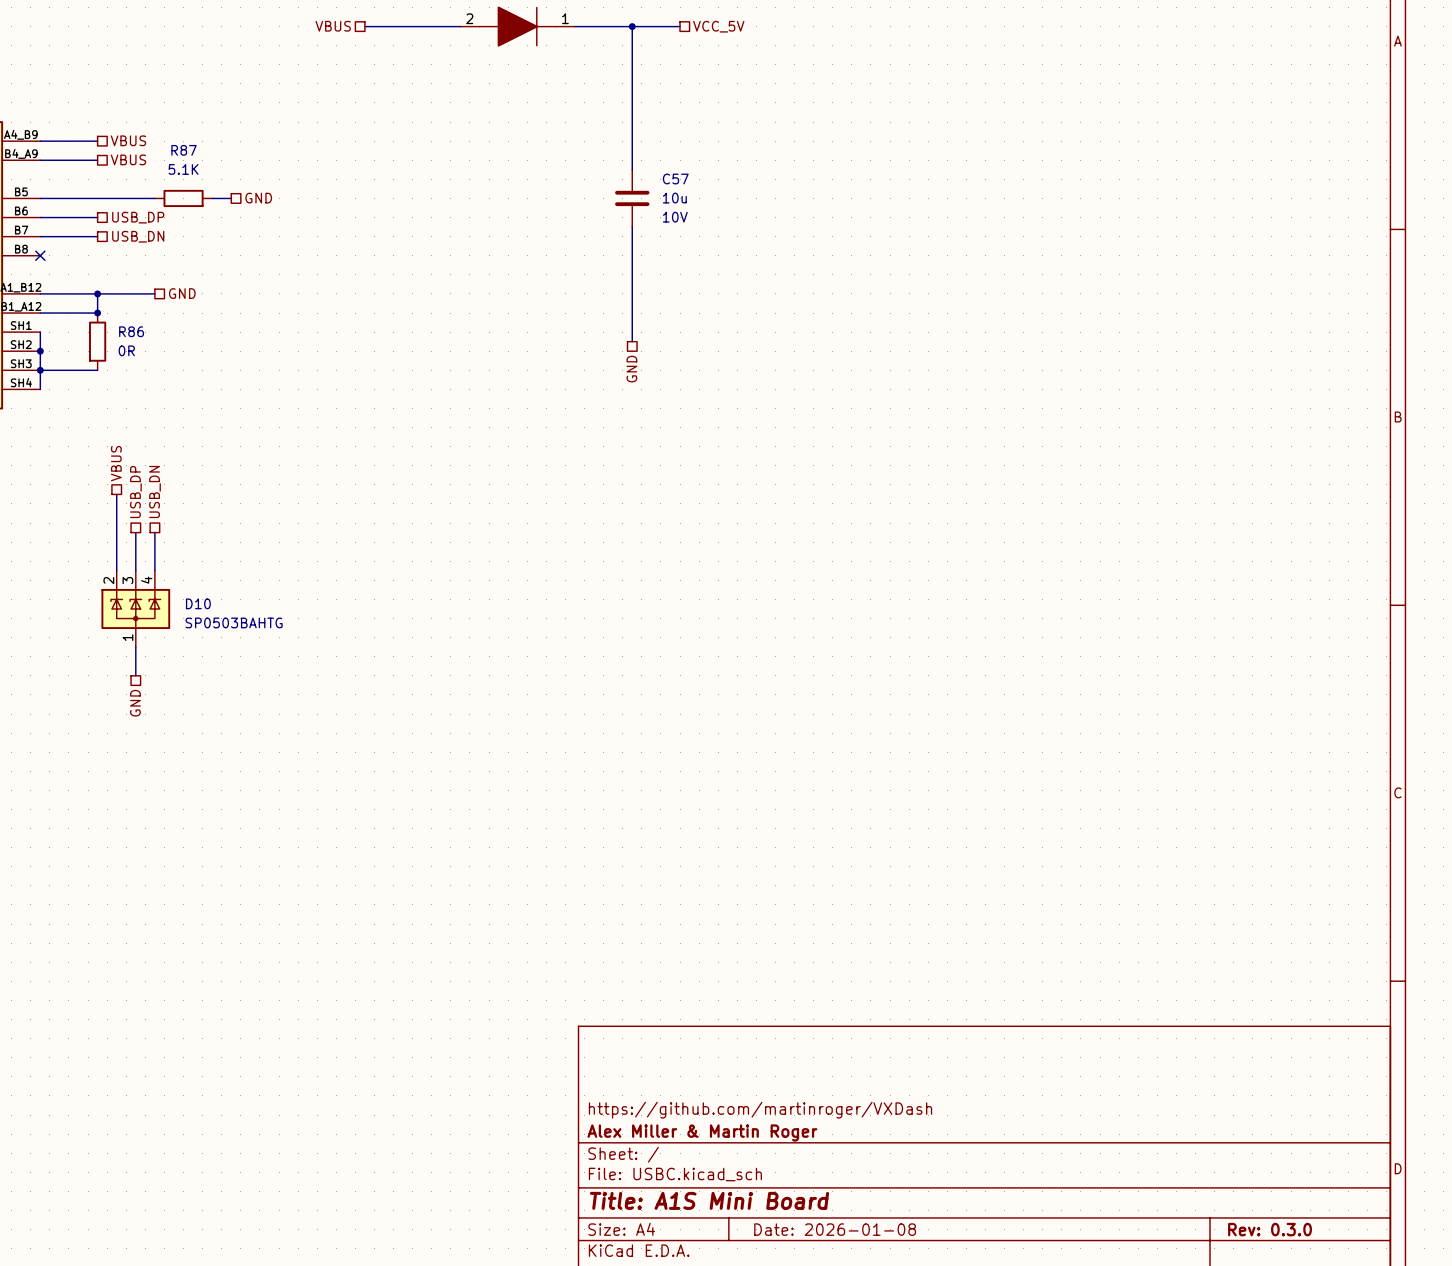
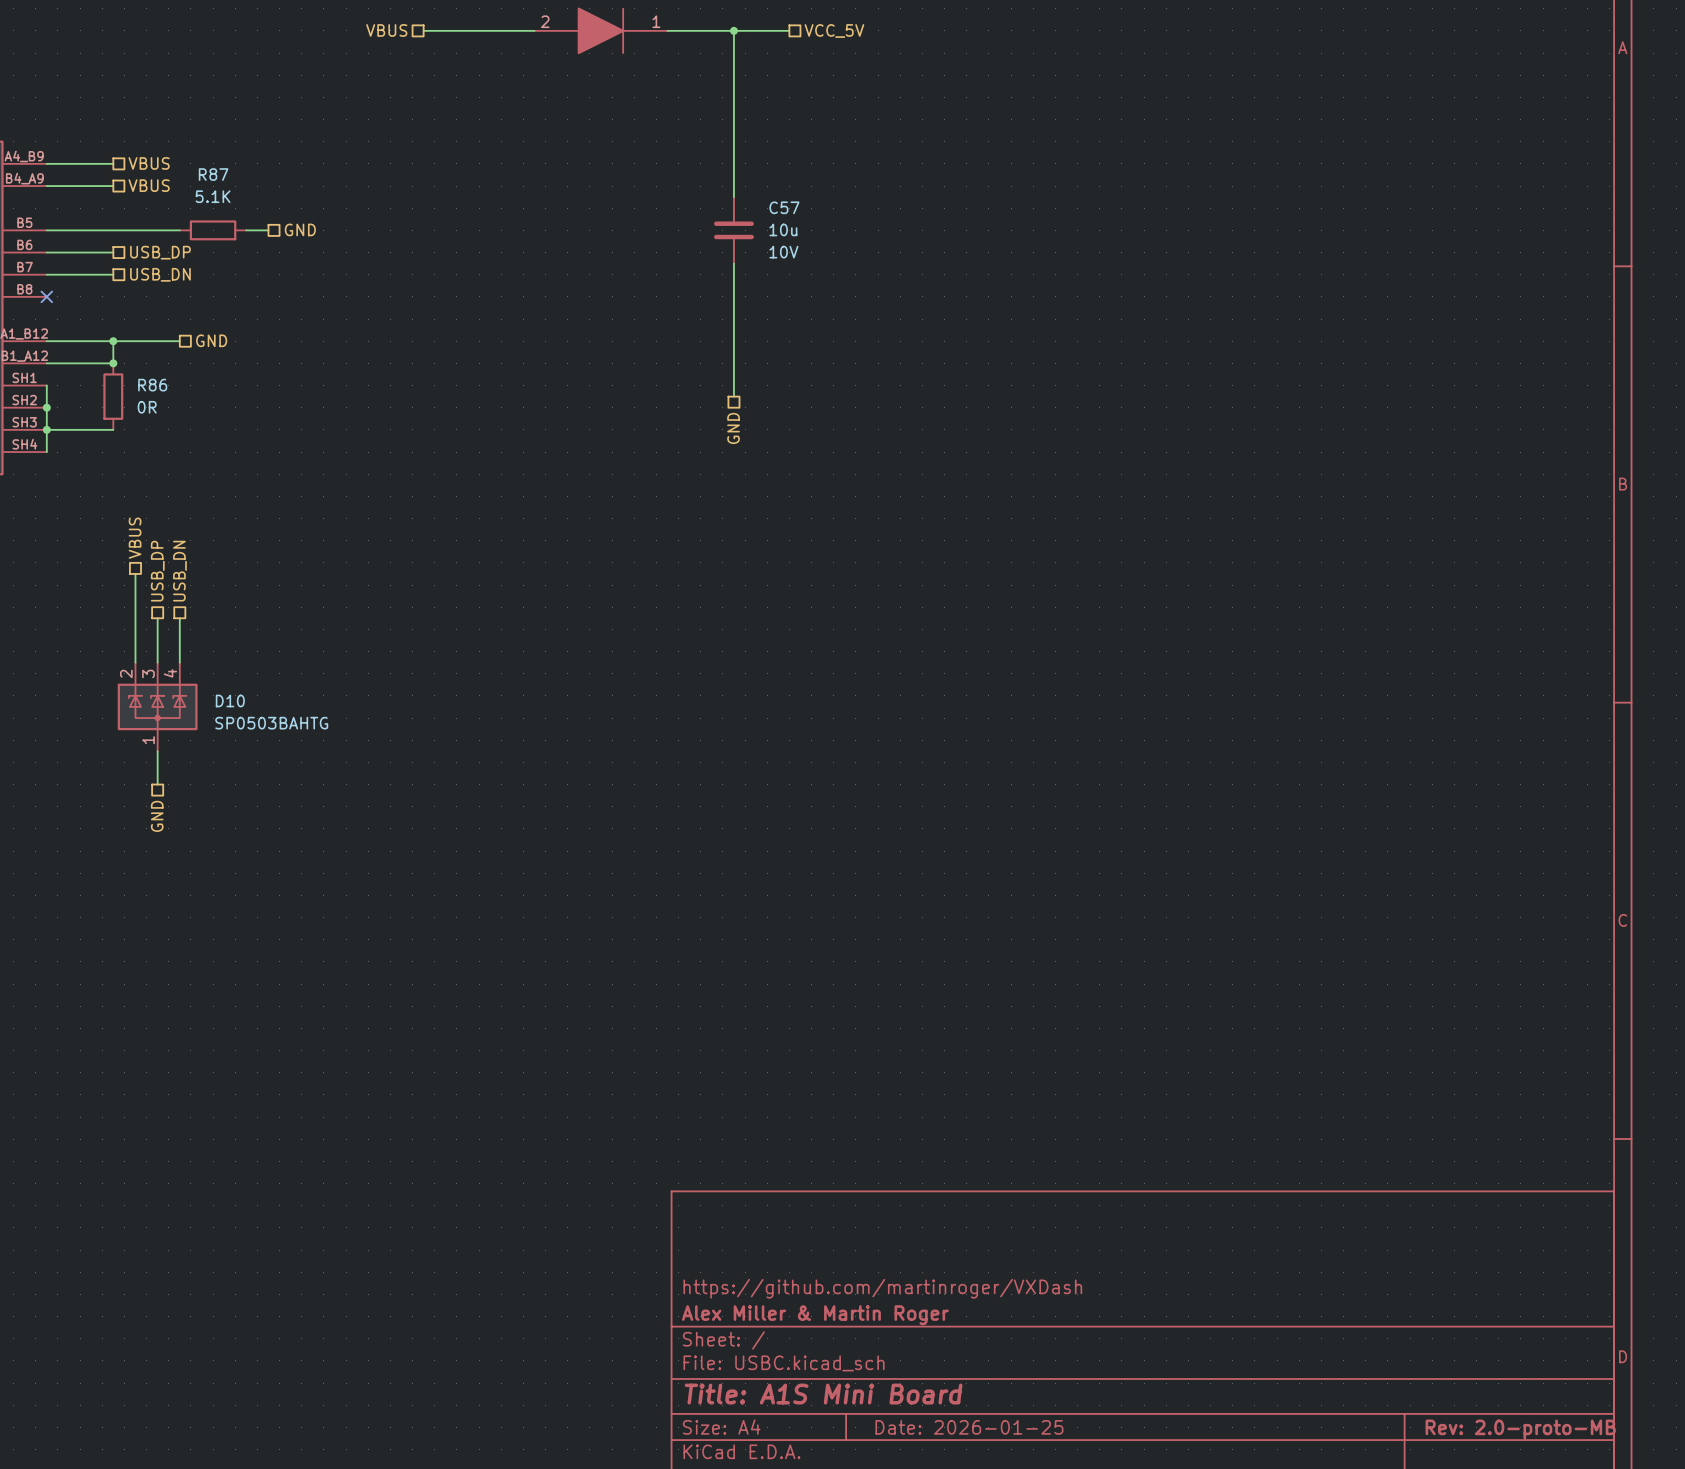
title block: Date: 2026-01-08 (835, 1229) -> Date: 2026-01-25 (969, 1427)
title block: Rev: 0.3.0 (1270, 1229) -> Rev: 2.0-proto-MB (1520, 1429)

